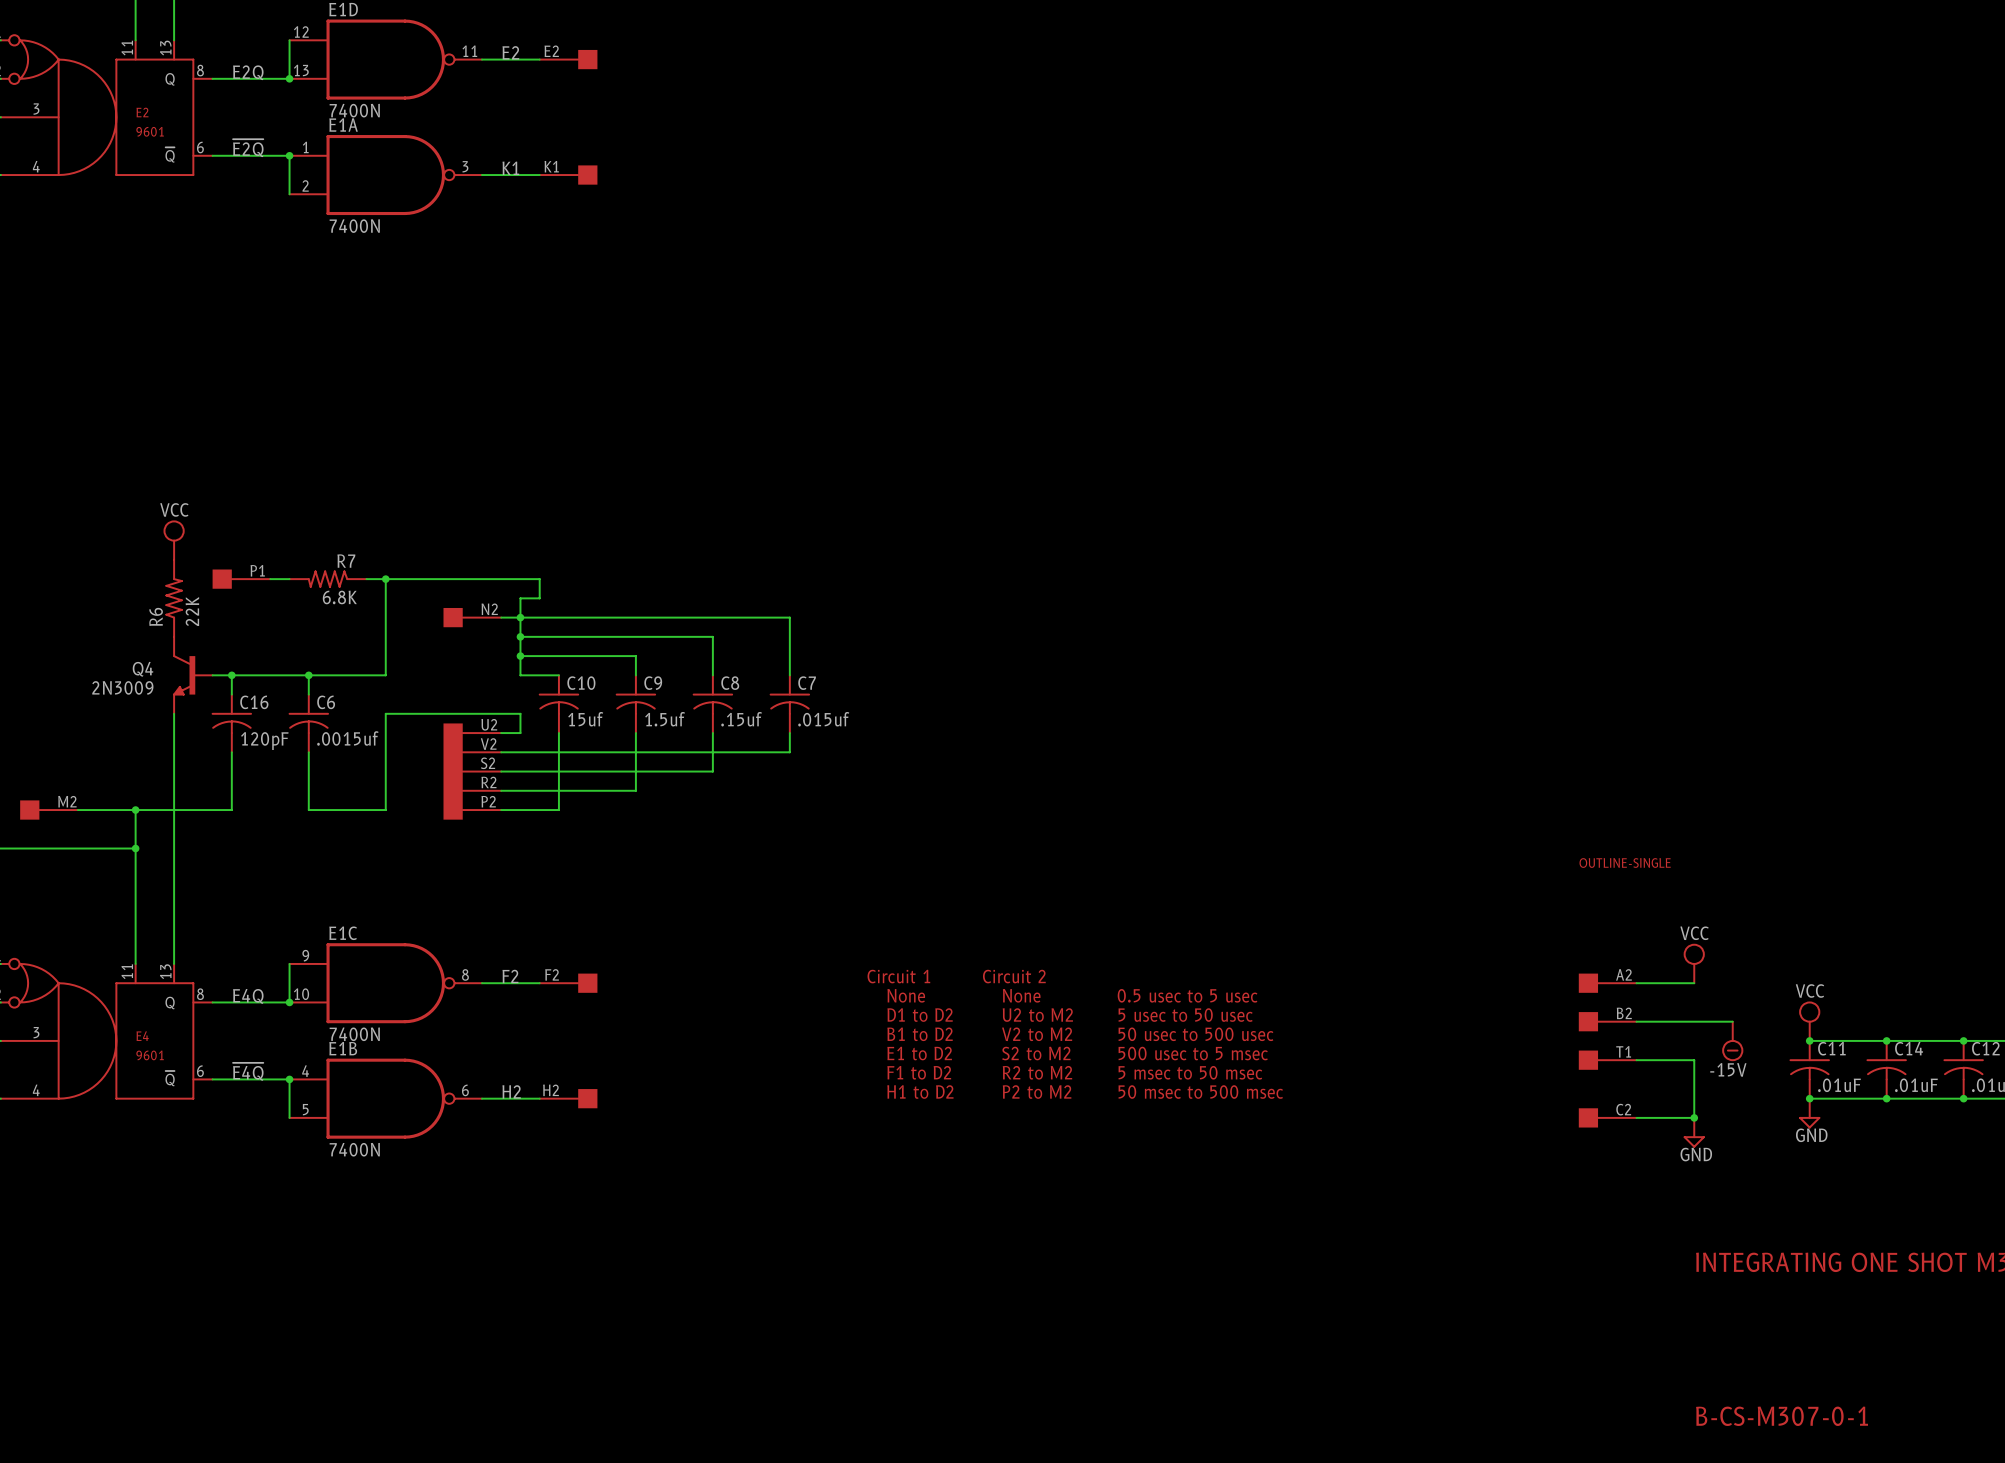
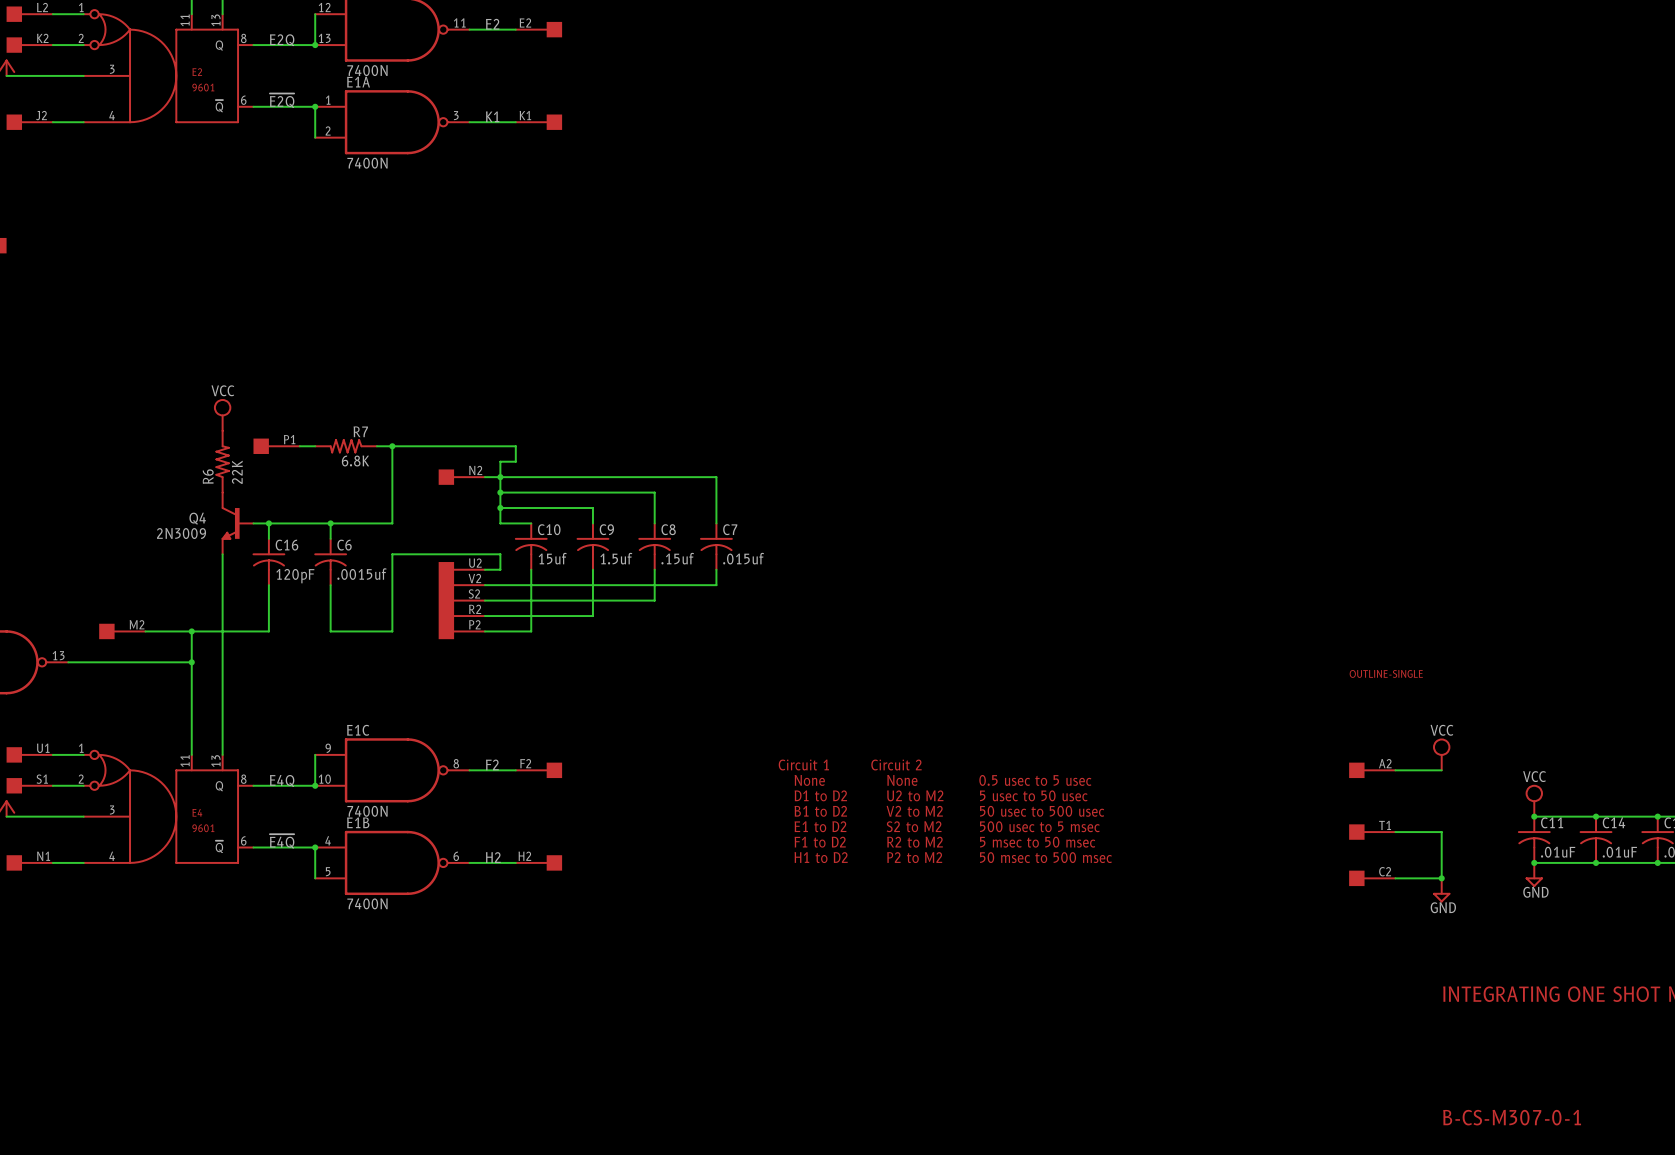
part: (1607, 1021) -> none
wire: (1636, 1021) (1732, 1021) -> none
power symbol: -15V (1732, 1041) -> none

